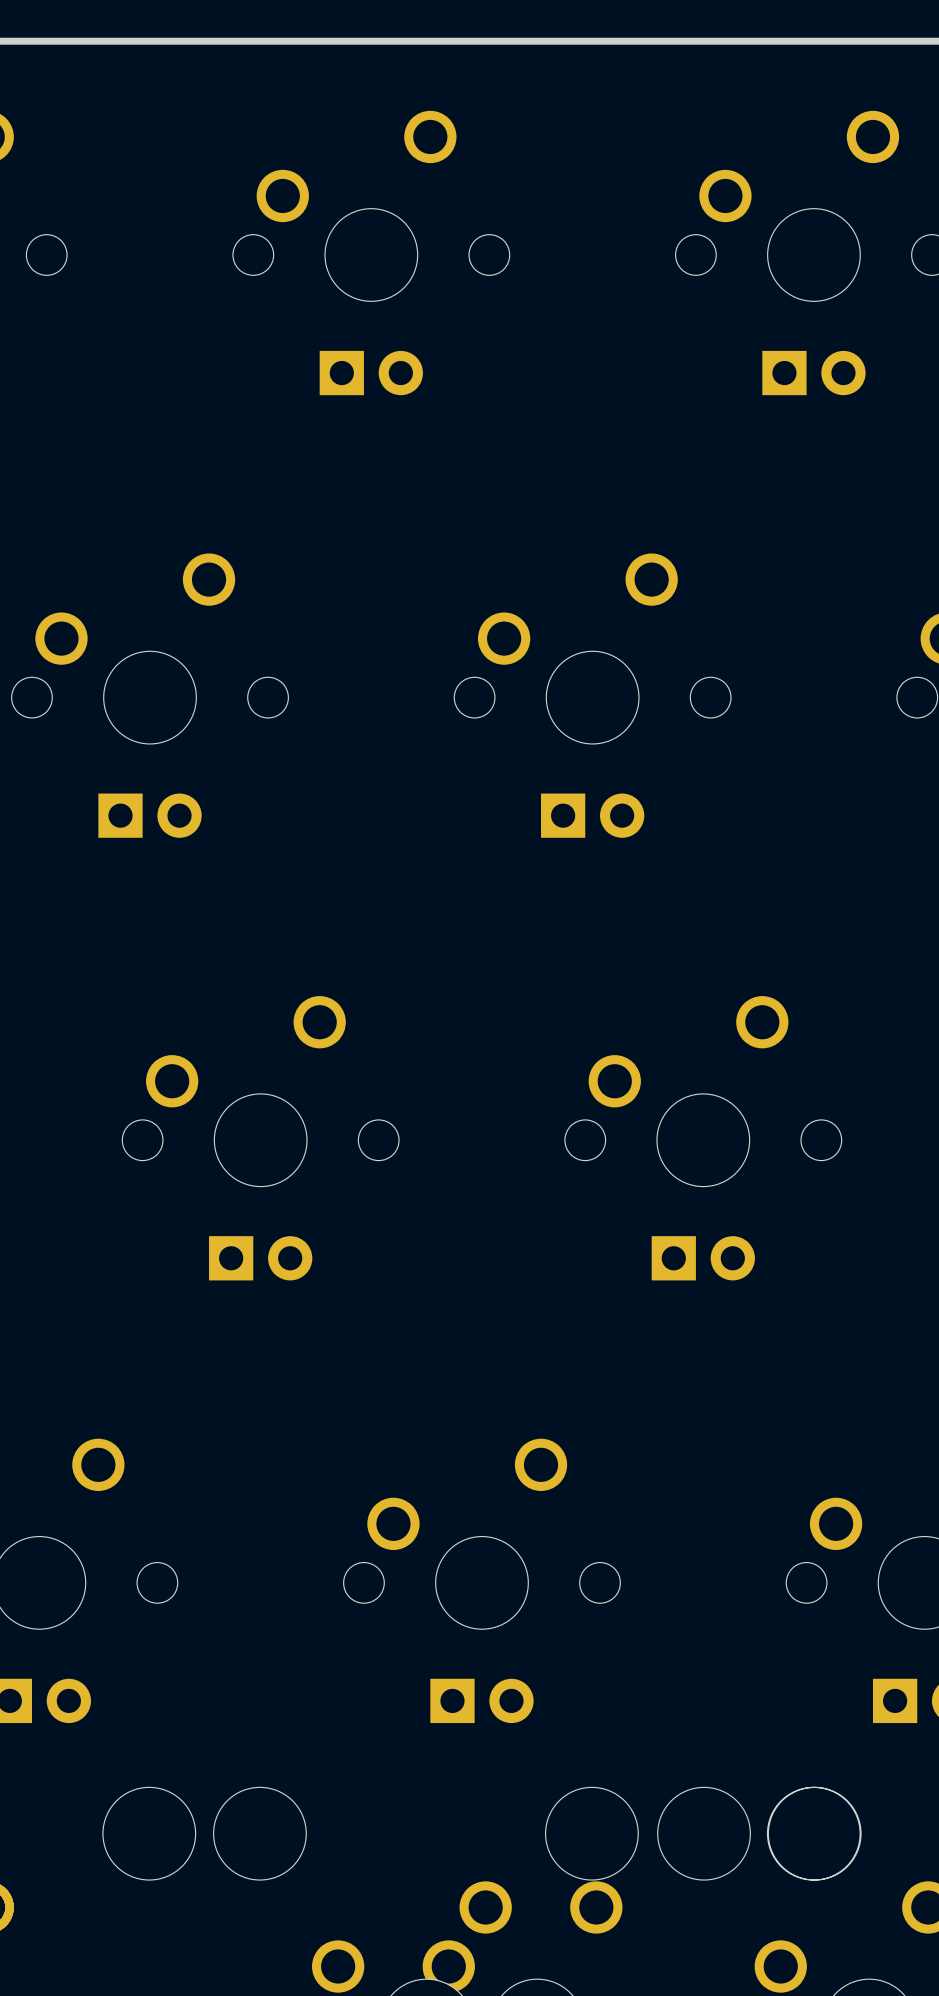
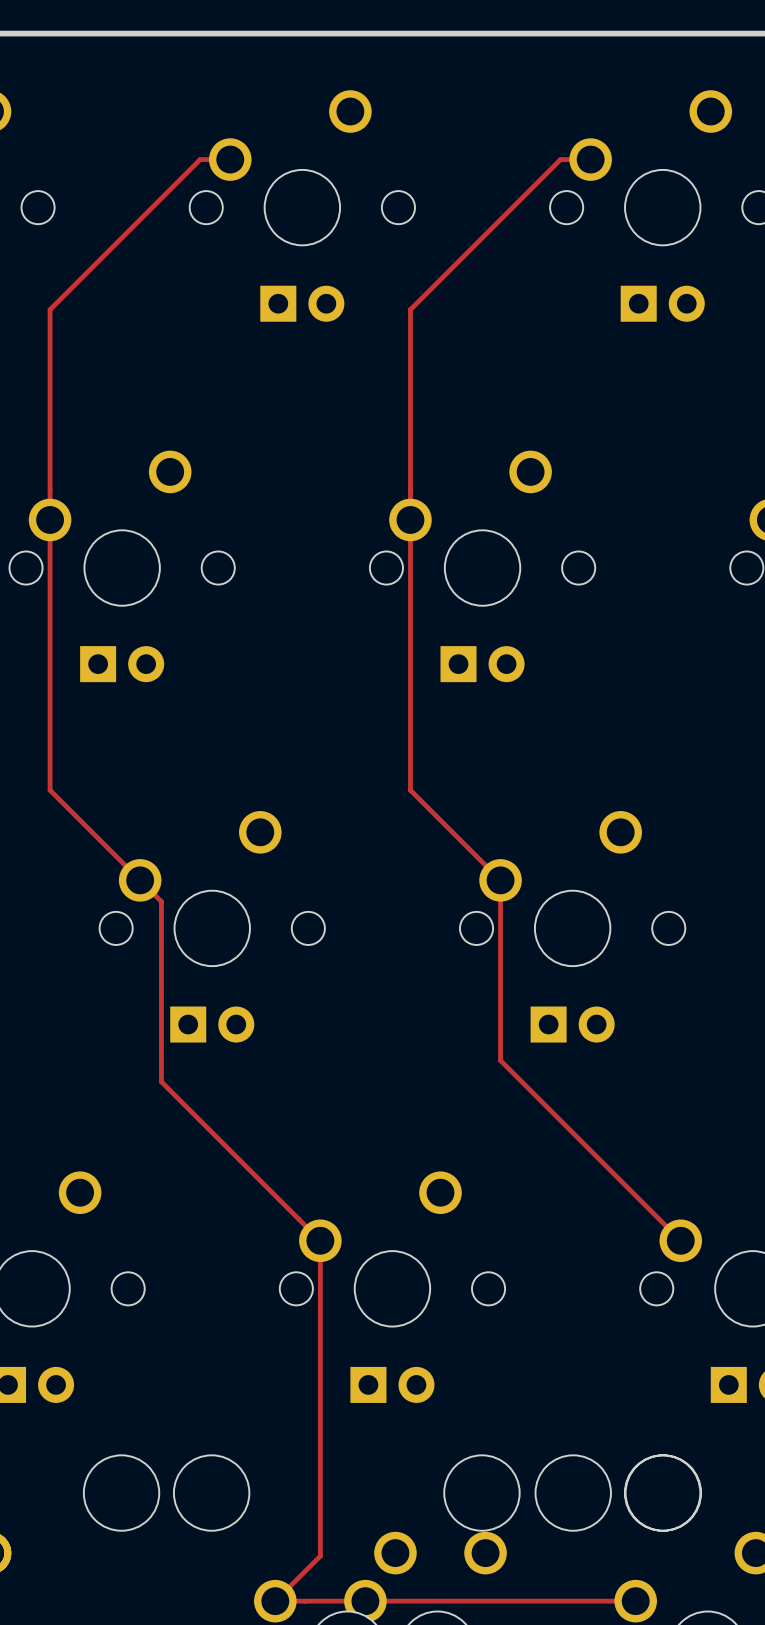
track: none -> (230, 159) (200, 159) (50, 309) (50, 790) (161, 901) (161, 1081) (320, 1240) (320, 1556) (275, 1601) (635, 1601)
track: none -> (590, 159) (560, 159) (410, 309) (410, 790) (500, 880) (500, 1060) (680, 1240)

